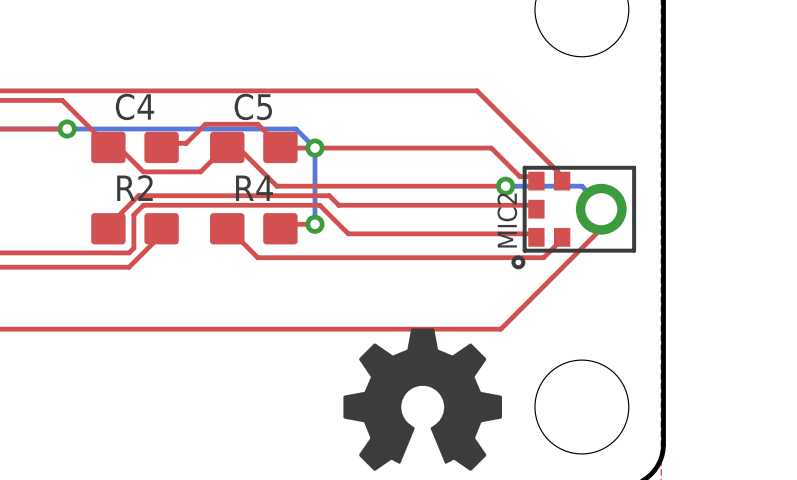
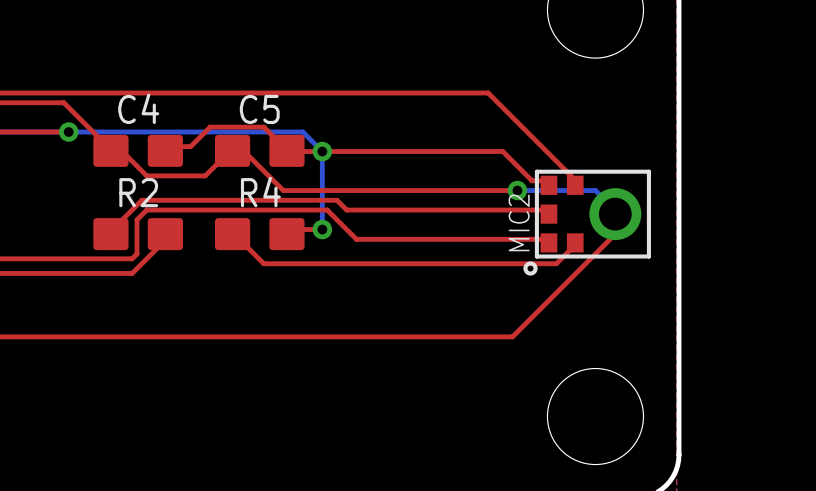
drawing: [343, 328, 502, 471] -> none

